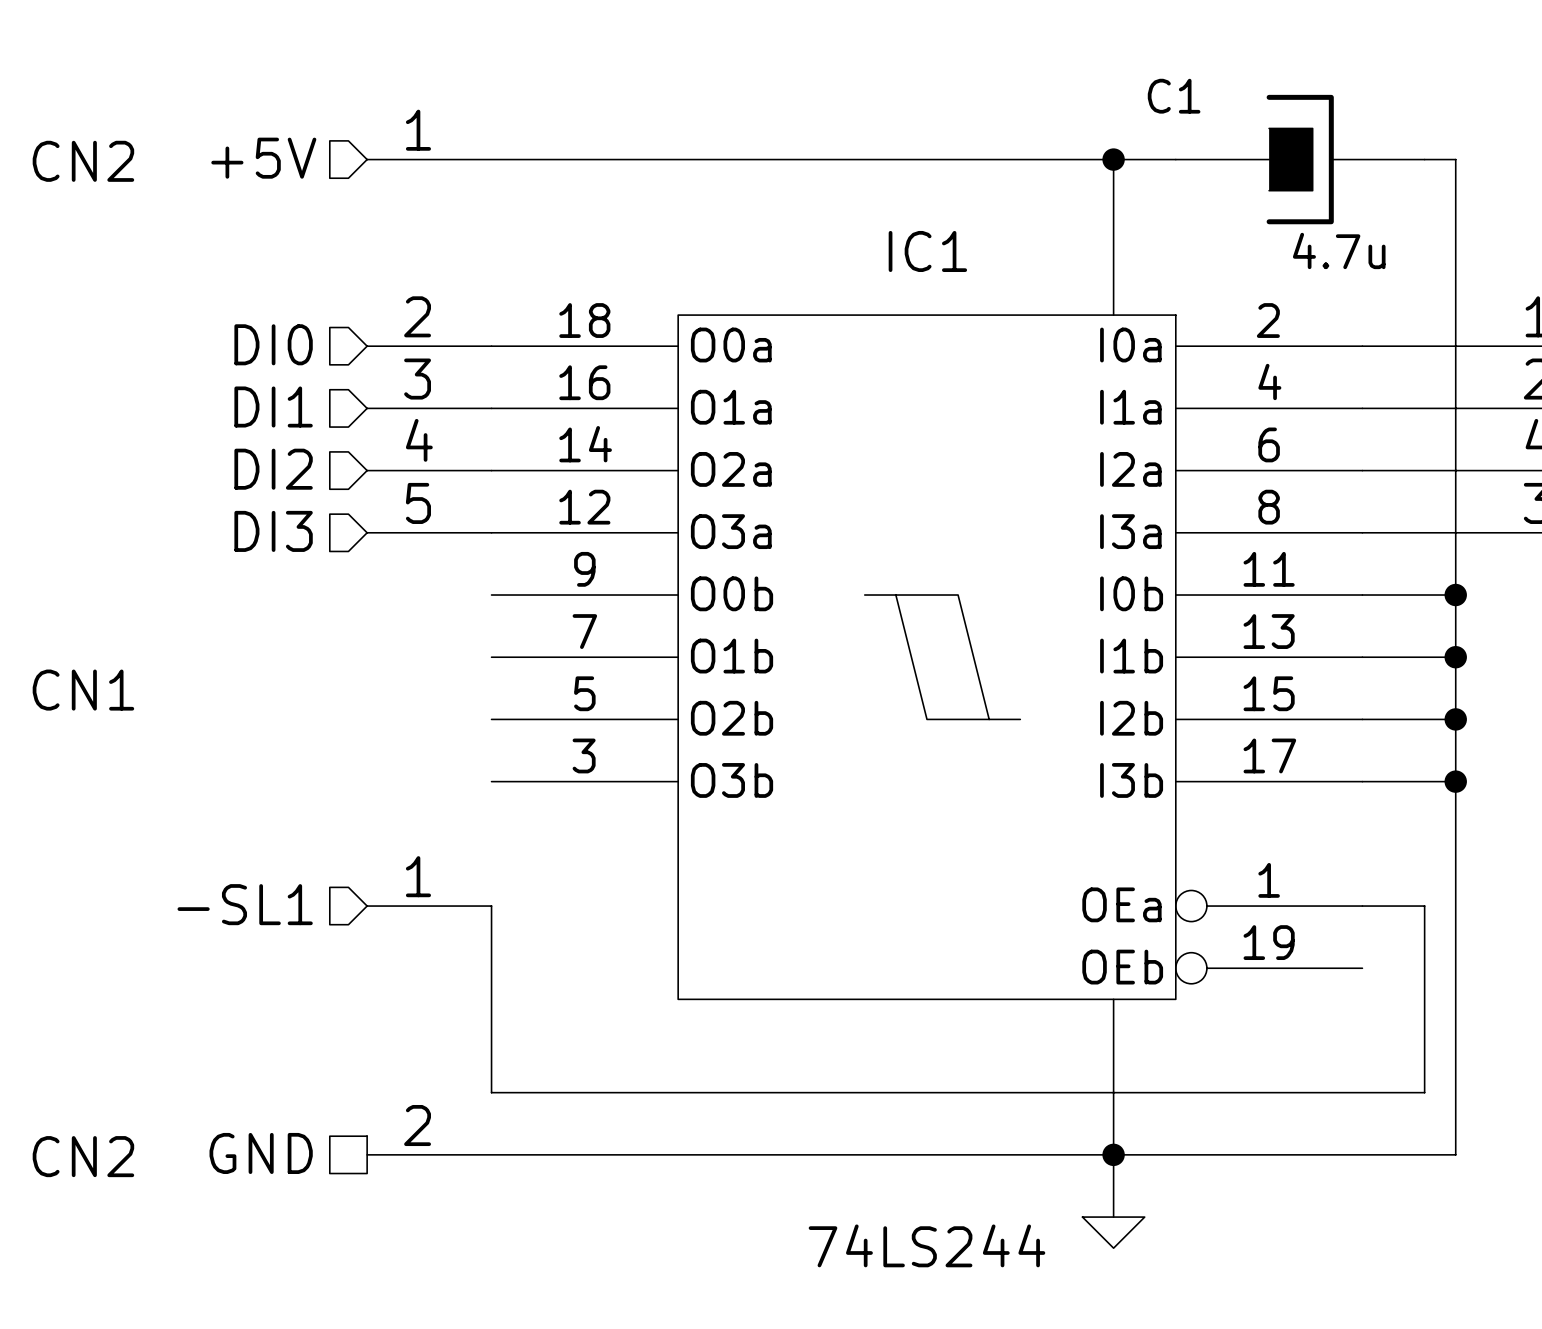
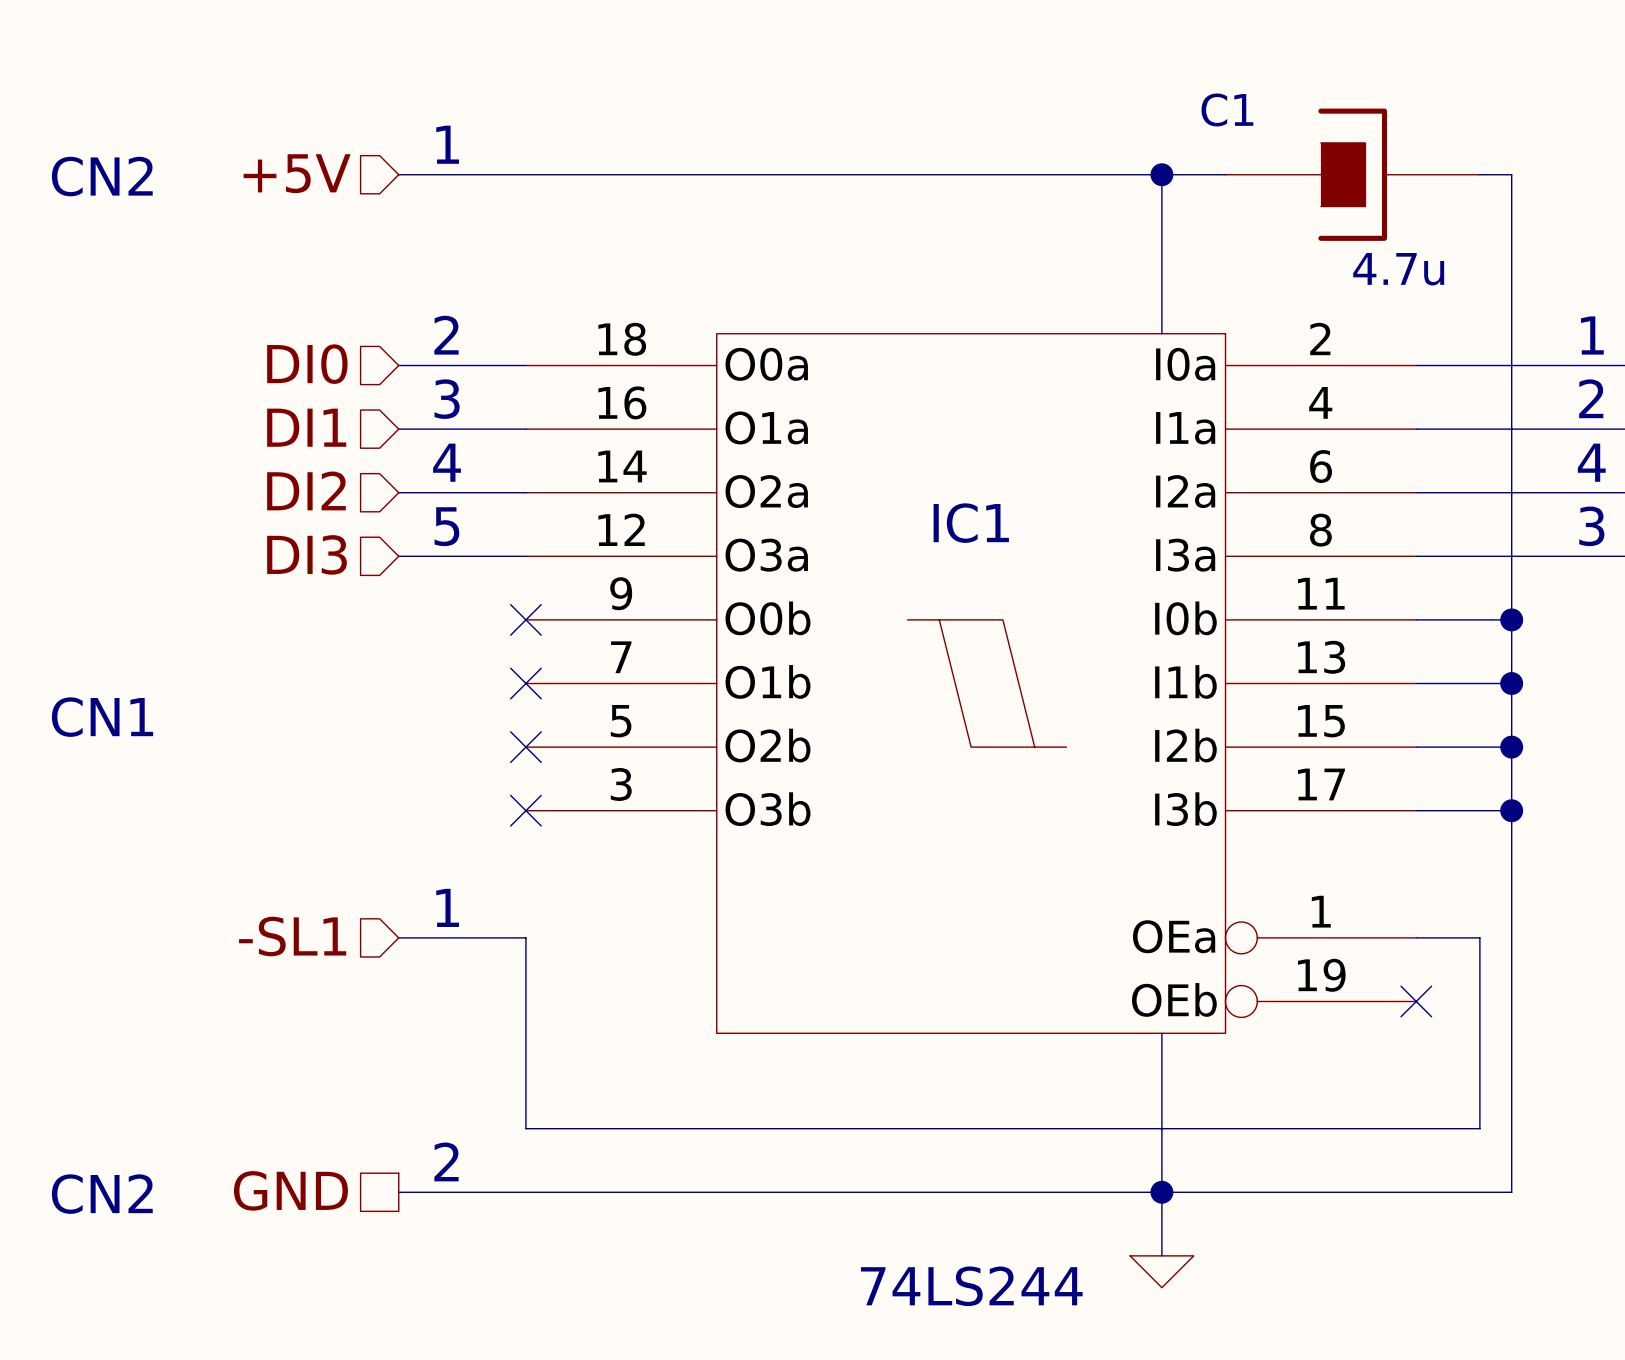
IC1 name position: IC1 (927, 251) -> IC1 (971, 523)
no-connect mark: none -> (525, 619)
no-connect mark: none -> (525, 683)
no-connect mark: none -> (525, 747)
no-connect mark: none -> (525, 810)
no-connect mark: none -> (1416, 1001)

